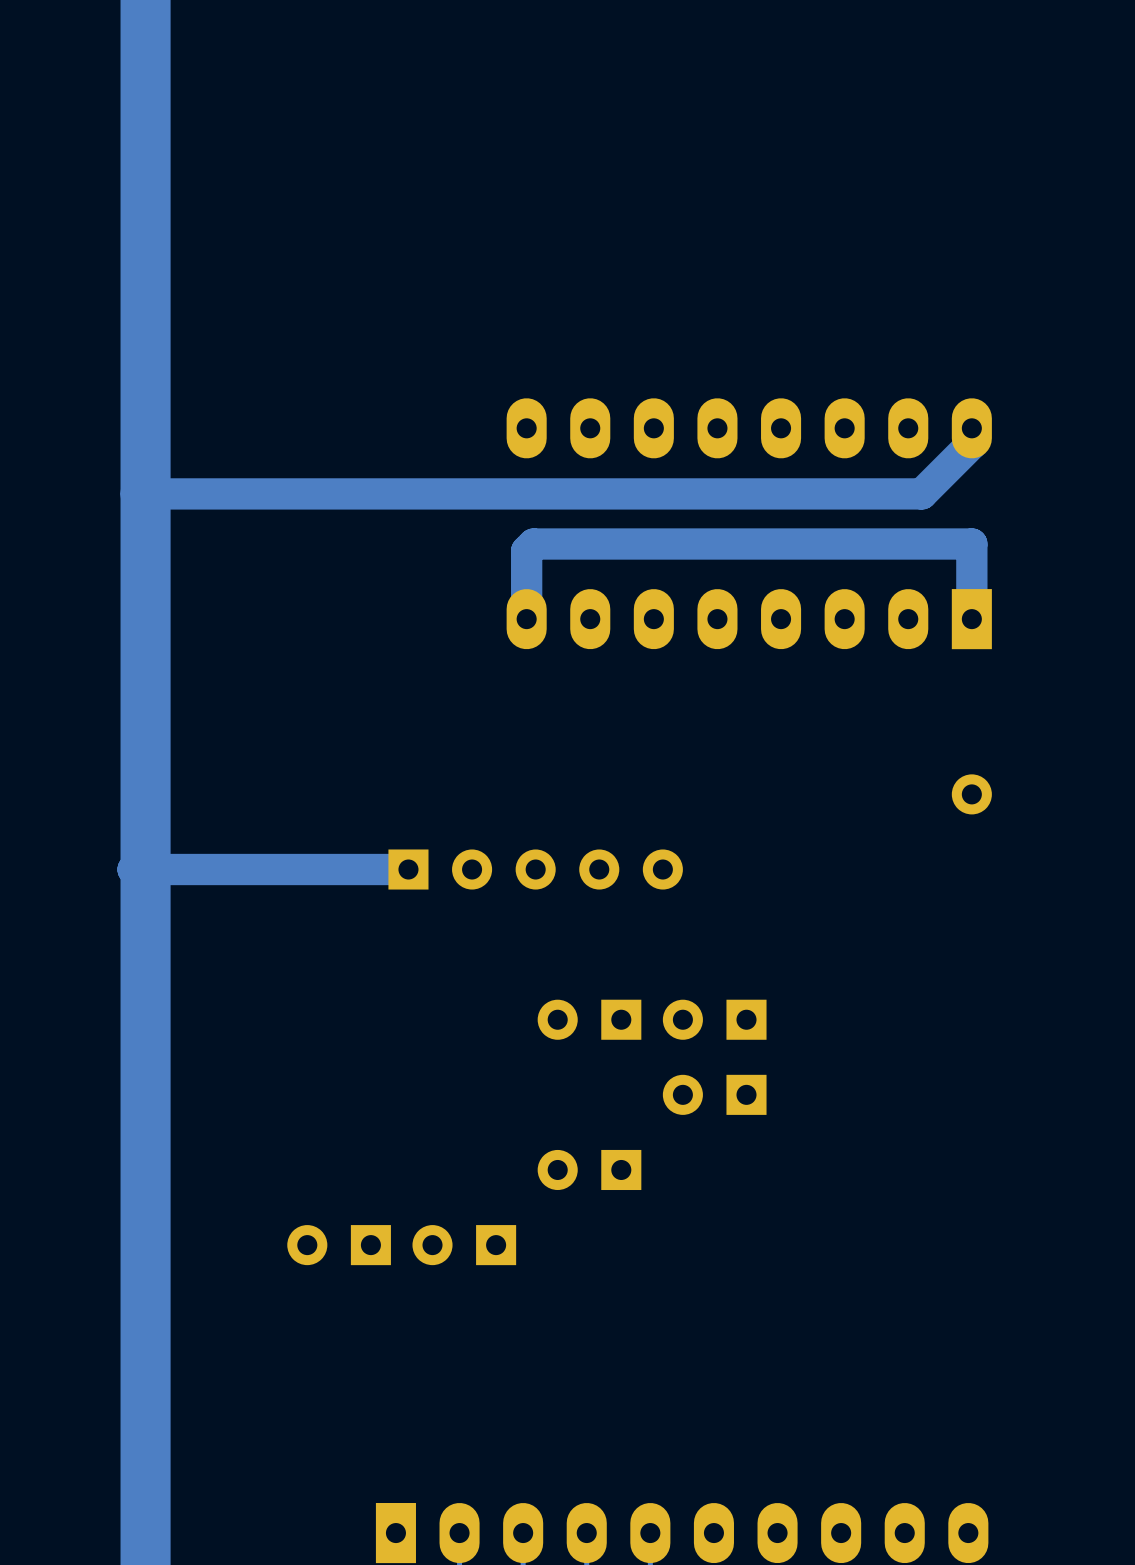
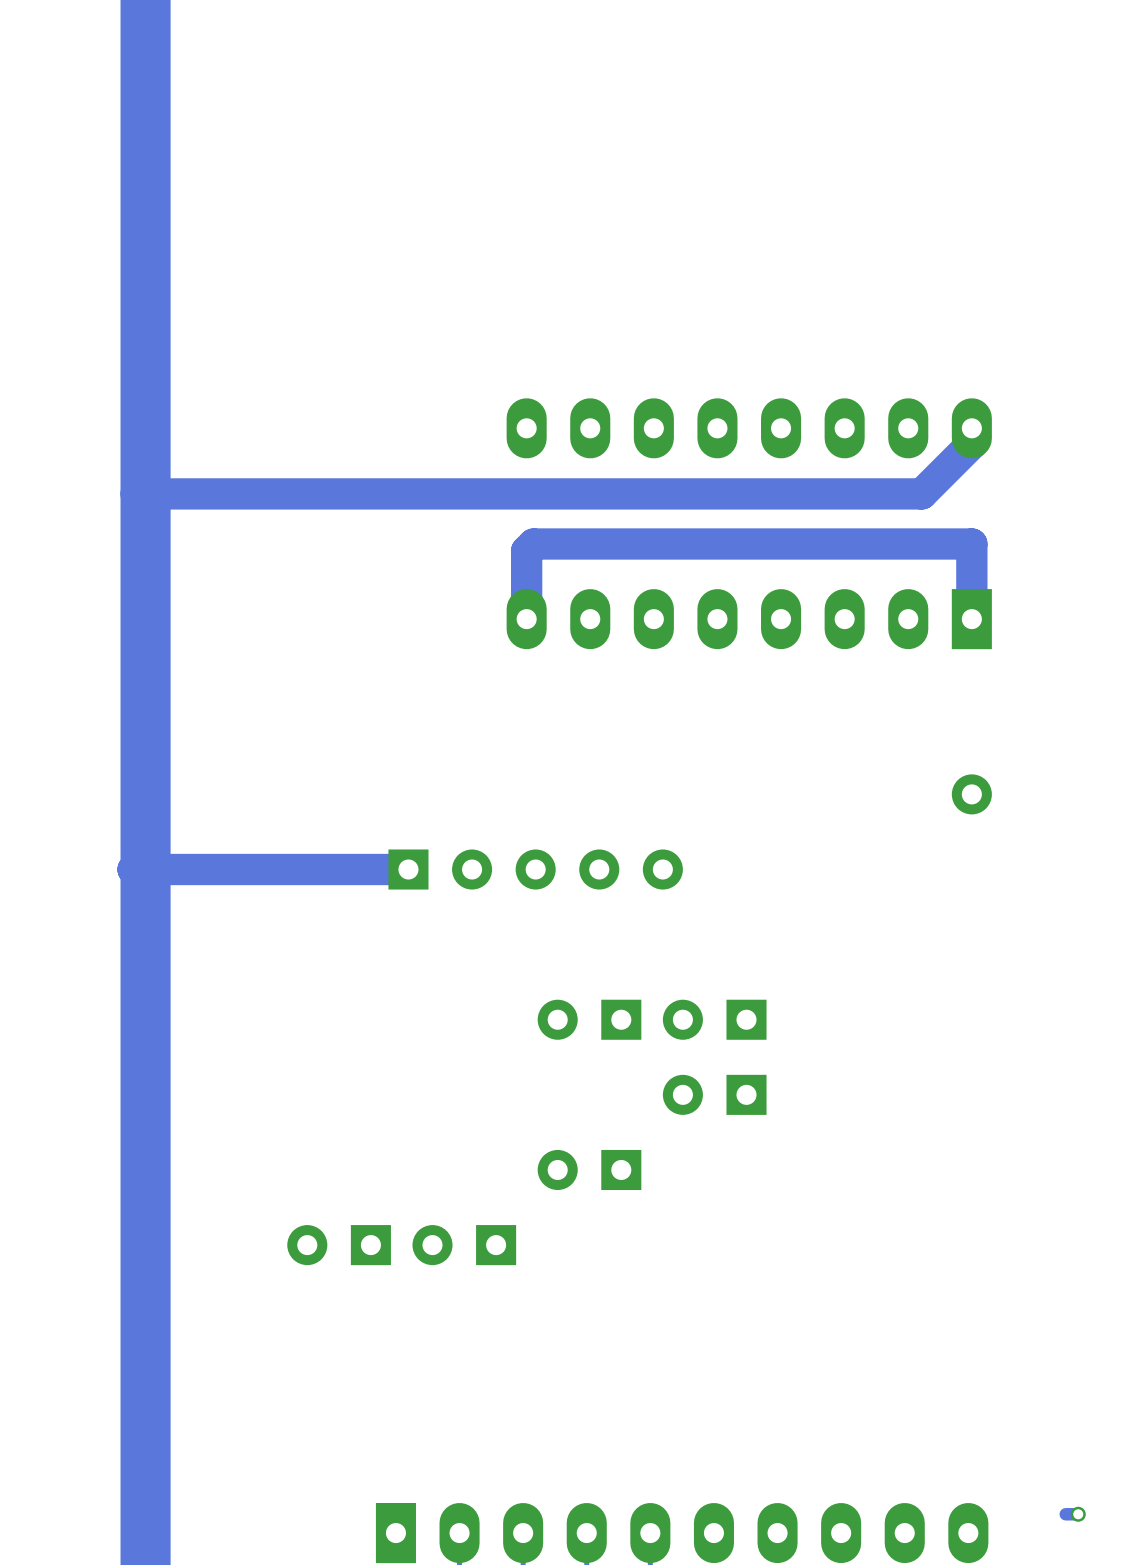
track: none -> (1078, 1514) (1065, 1514)
via: none -> (1078, 1514)

